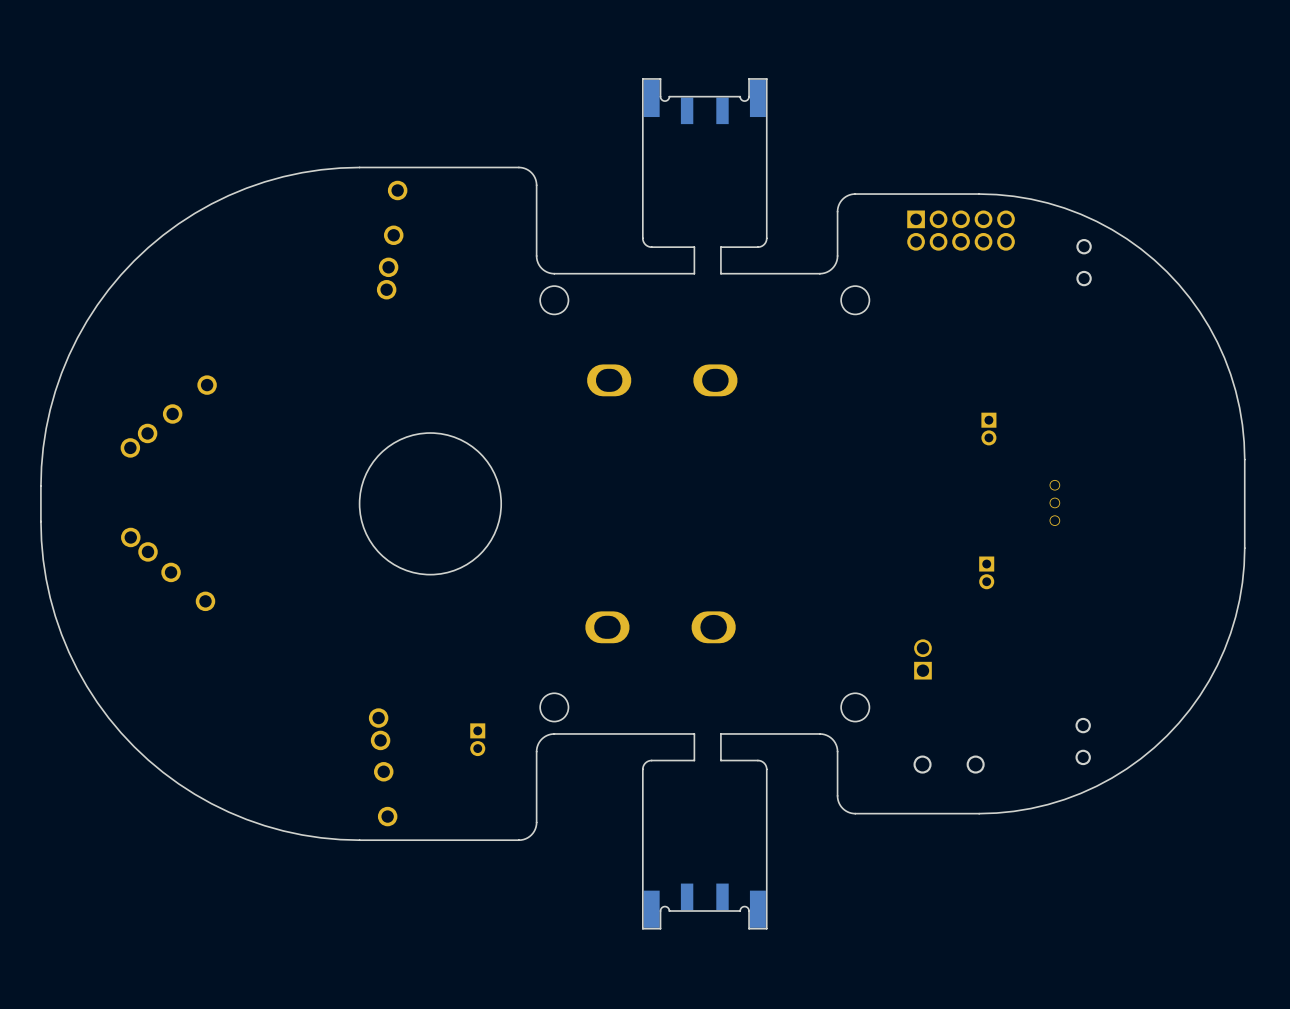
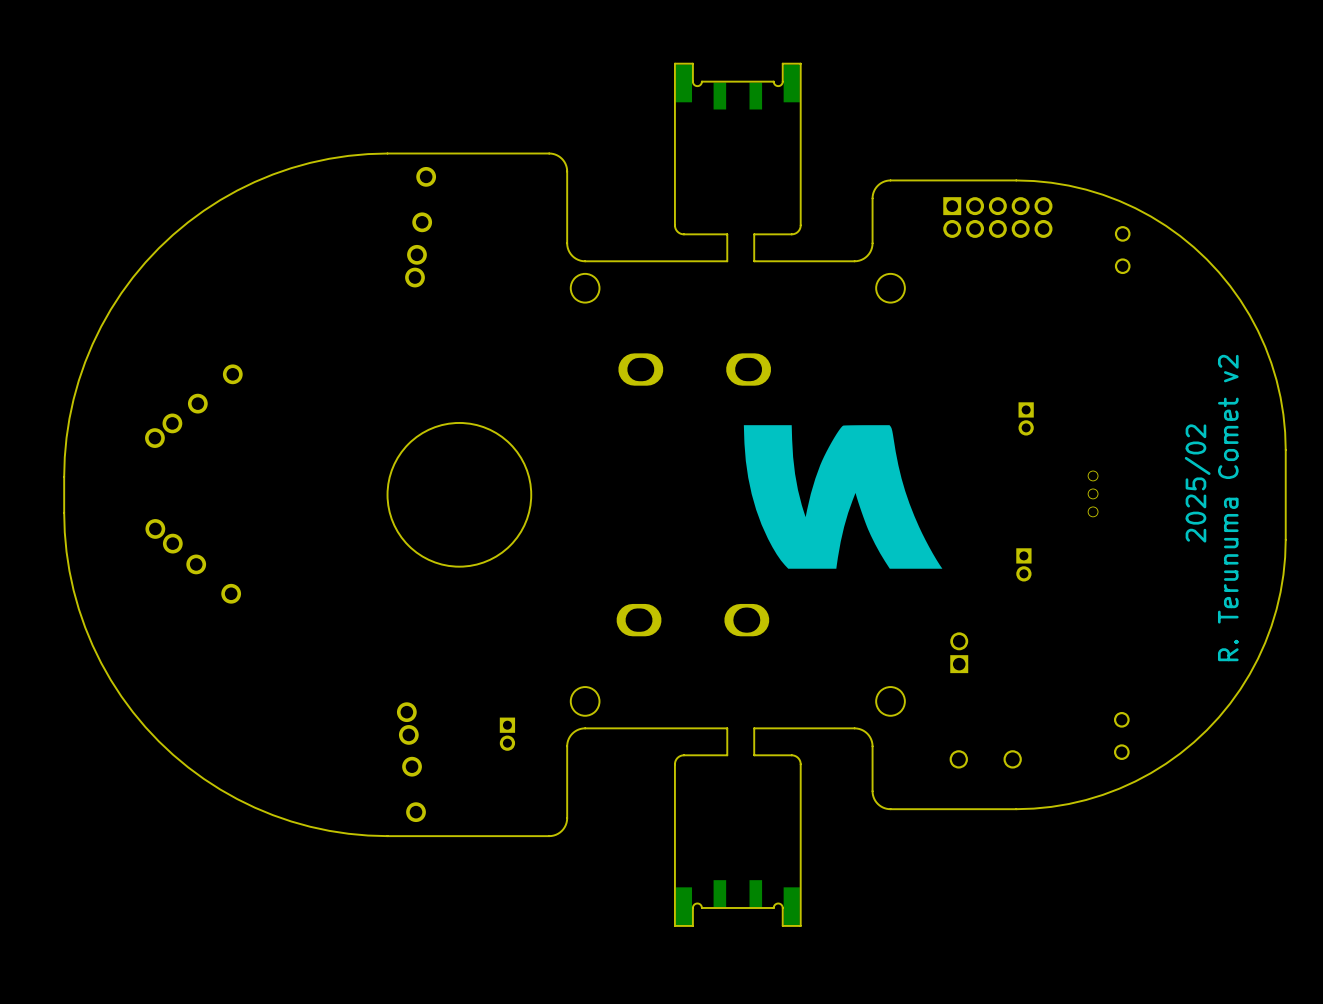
drawing: none -> [743, 425, 943, 569]
text: none -> 2025/02 (1197, 483)
text: none -> R. Terunuma Comet v2 (1228, 508)

